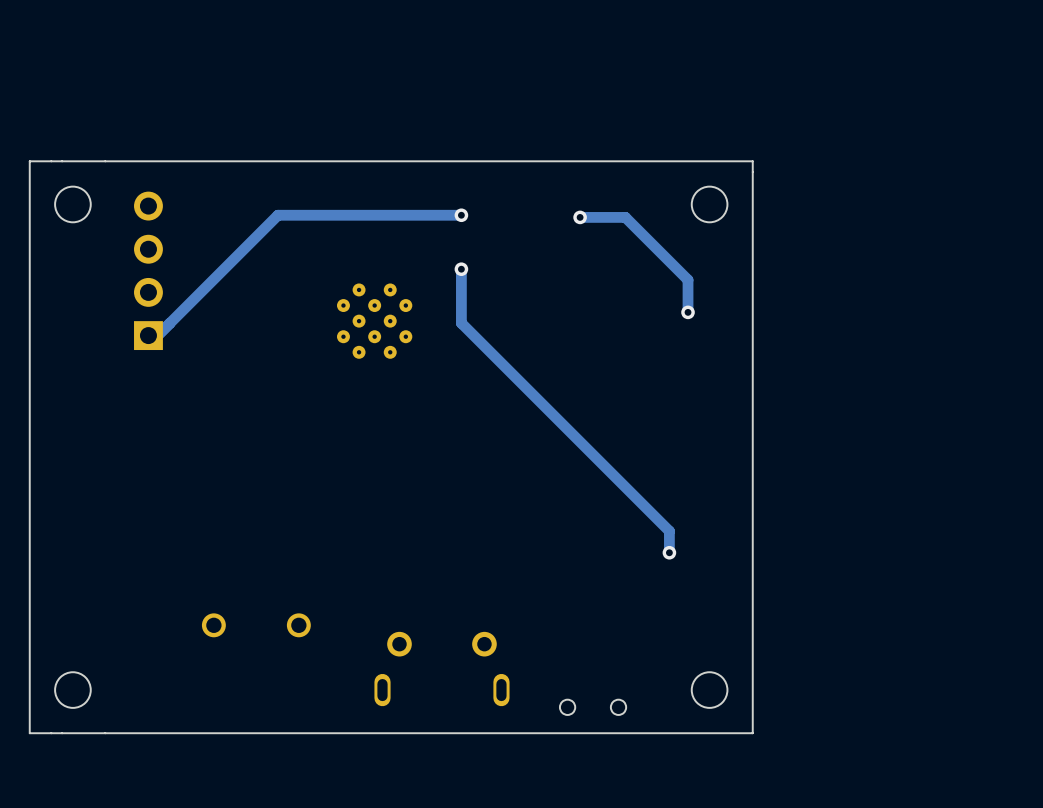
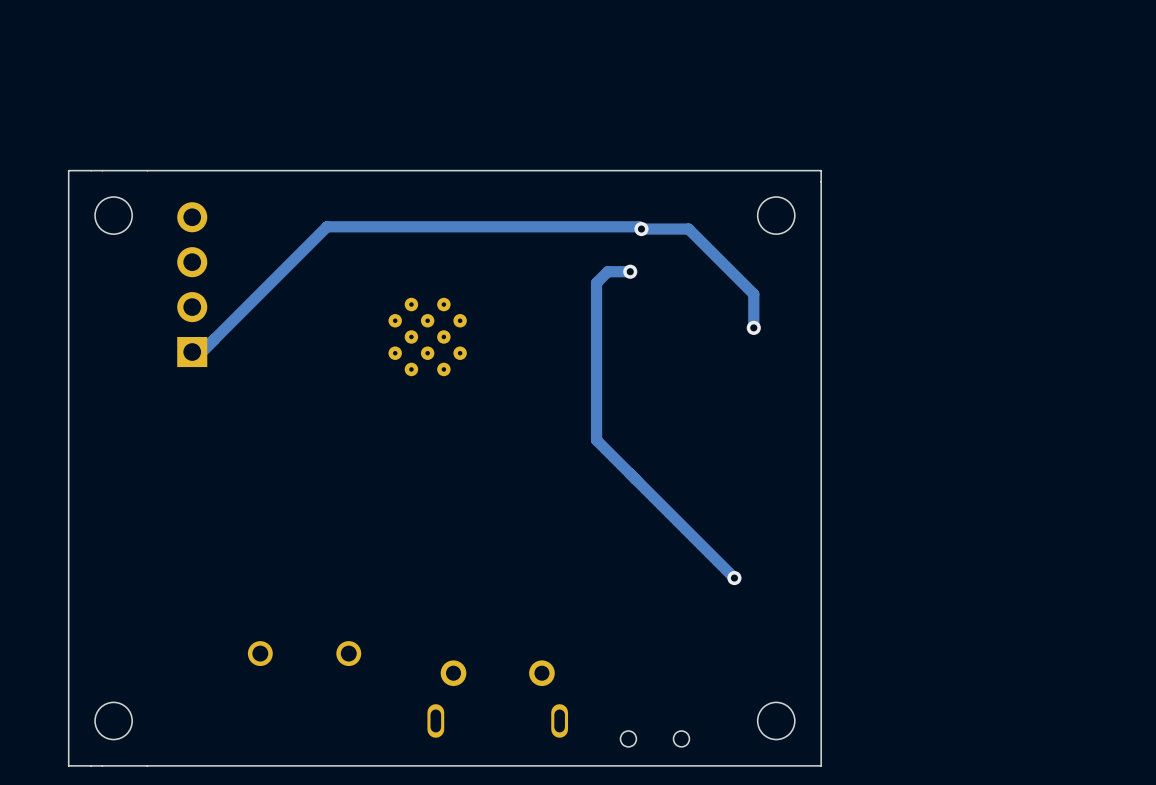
track: none -> (517, 226) (639, 226) (641, 229)
via: (461, 215) -> none
track: none -> (630, 271) (607, 271) (596, 282) (596, 440) (731, 574)
via: none -> (630, 271)
track: (461, 269) (461, 323) (669, 531) (669, 552) -> none
via: (461, 269) -> none

